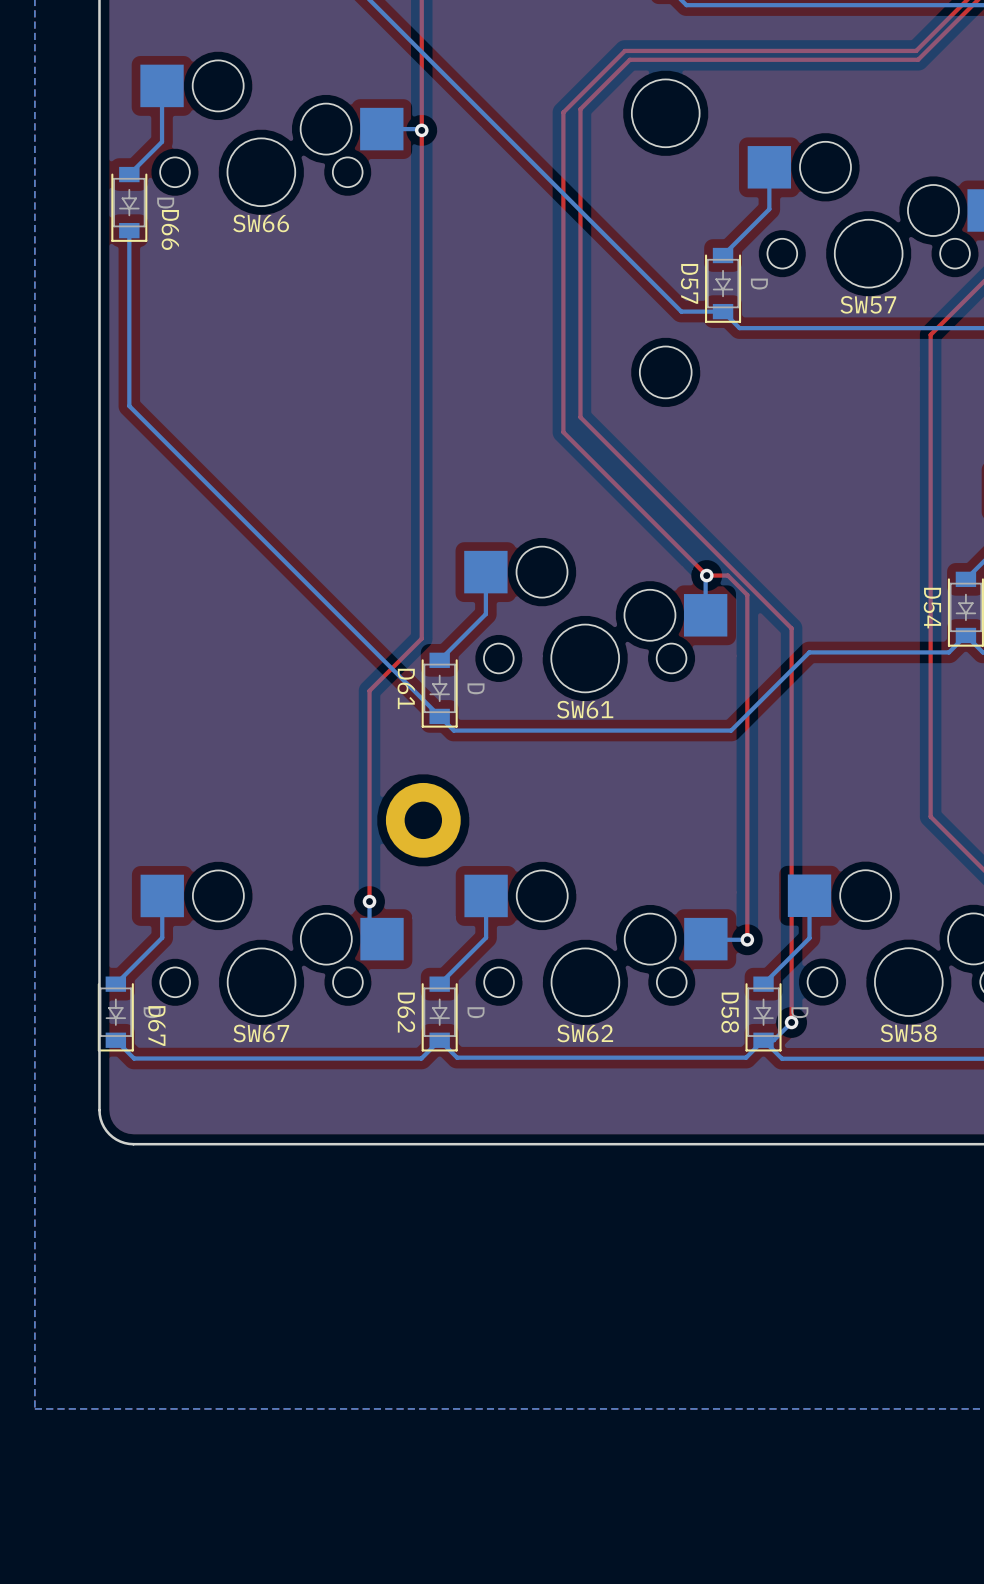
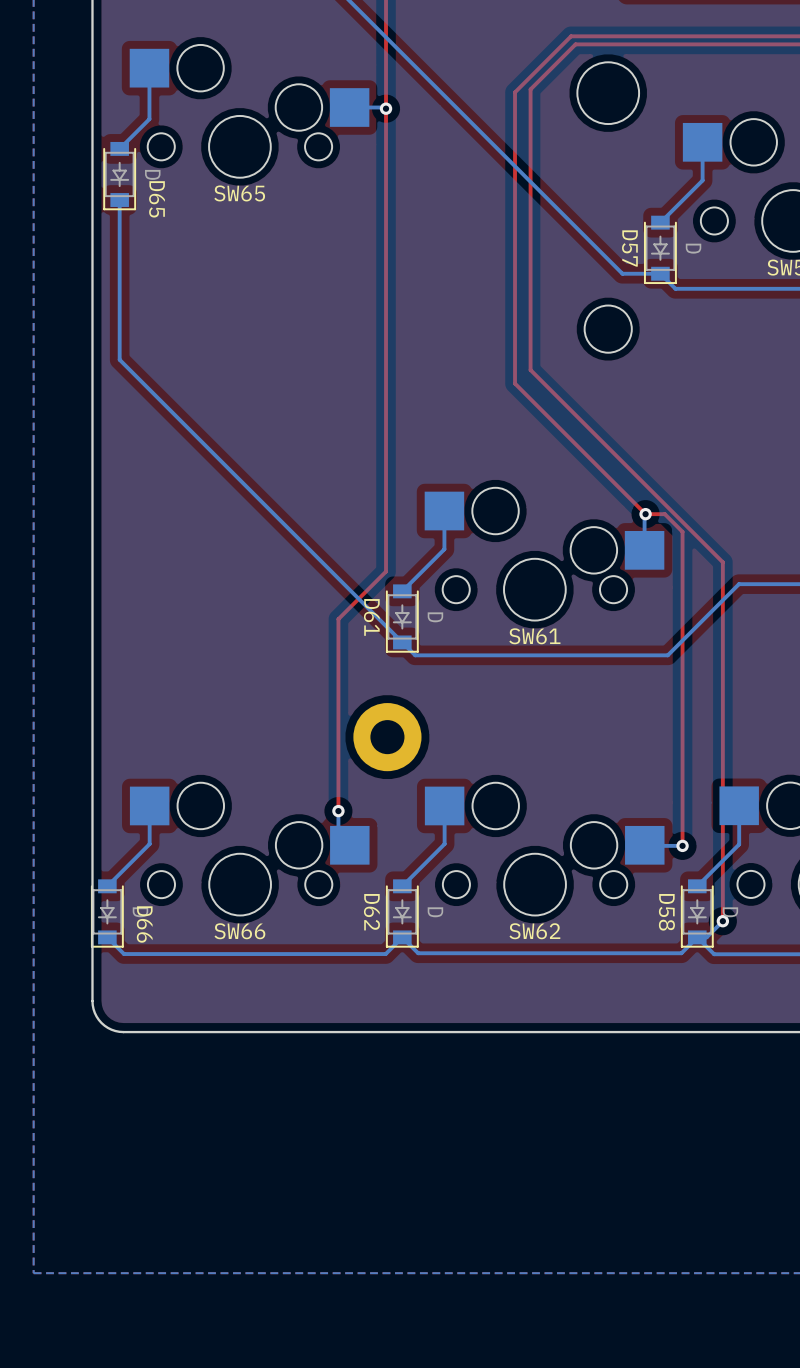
SW66 name: SW66 (261, 223) -> SW65 (239, 193)
D66 name: D66 (170, 229) -> D65 (156, 199)
D67 name: D67 (156, 1026) -> D66 (144, 924)
SW67 name: SW67 (261, 1033) -> SW66 (239, 931)

